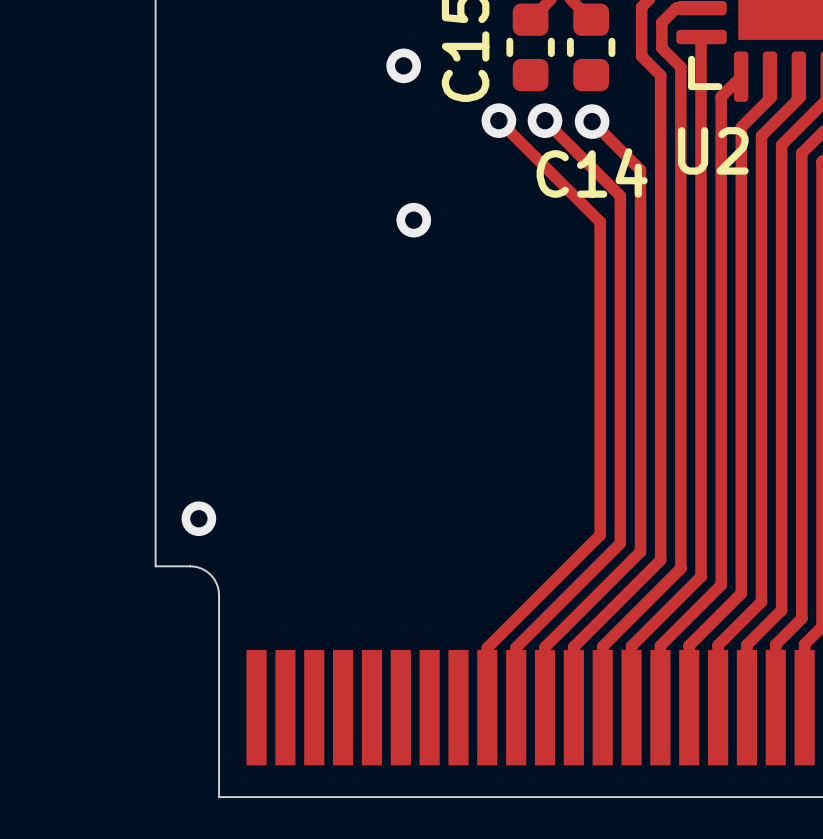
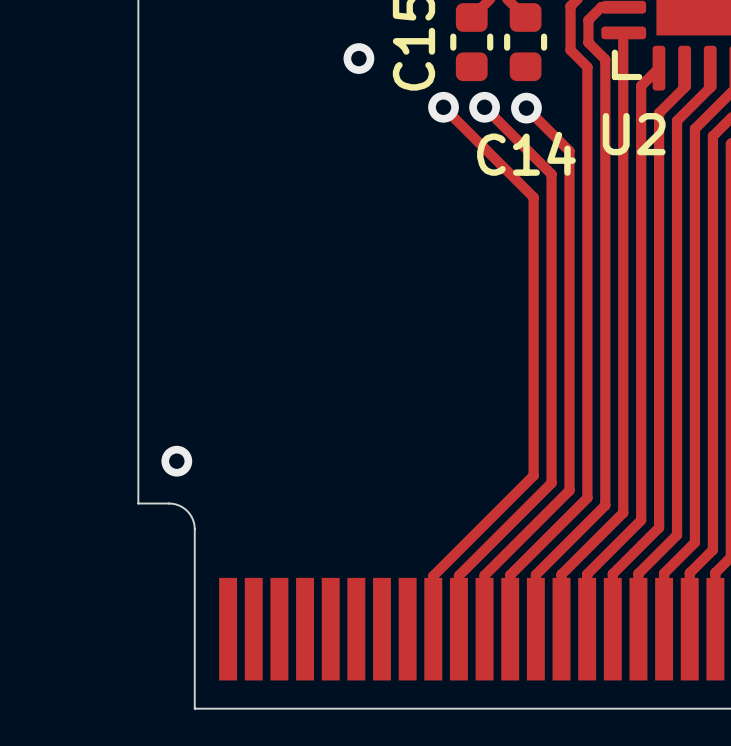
via: (413, 220) -> none

